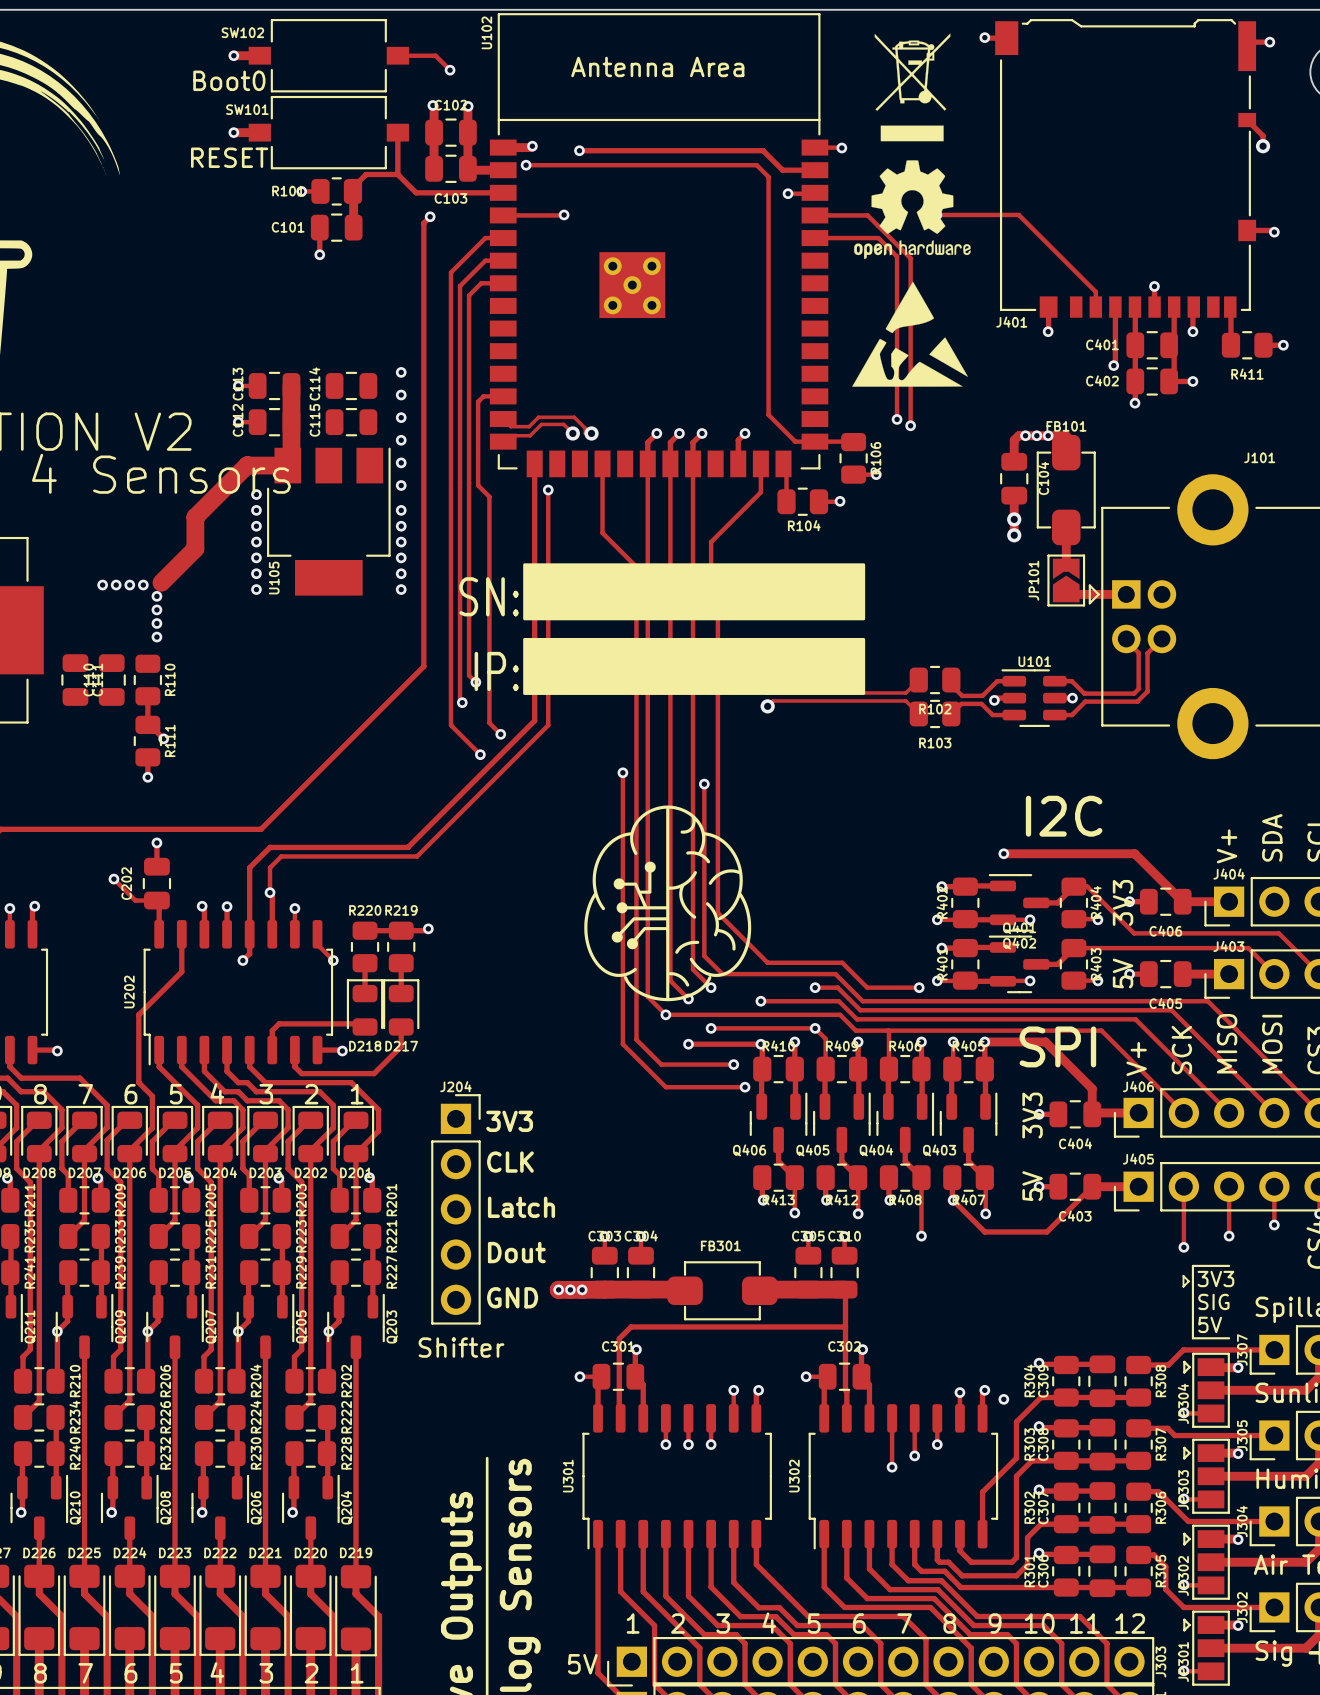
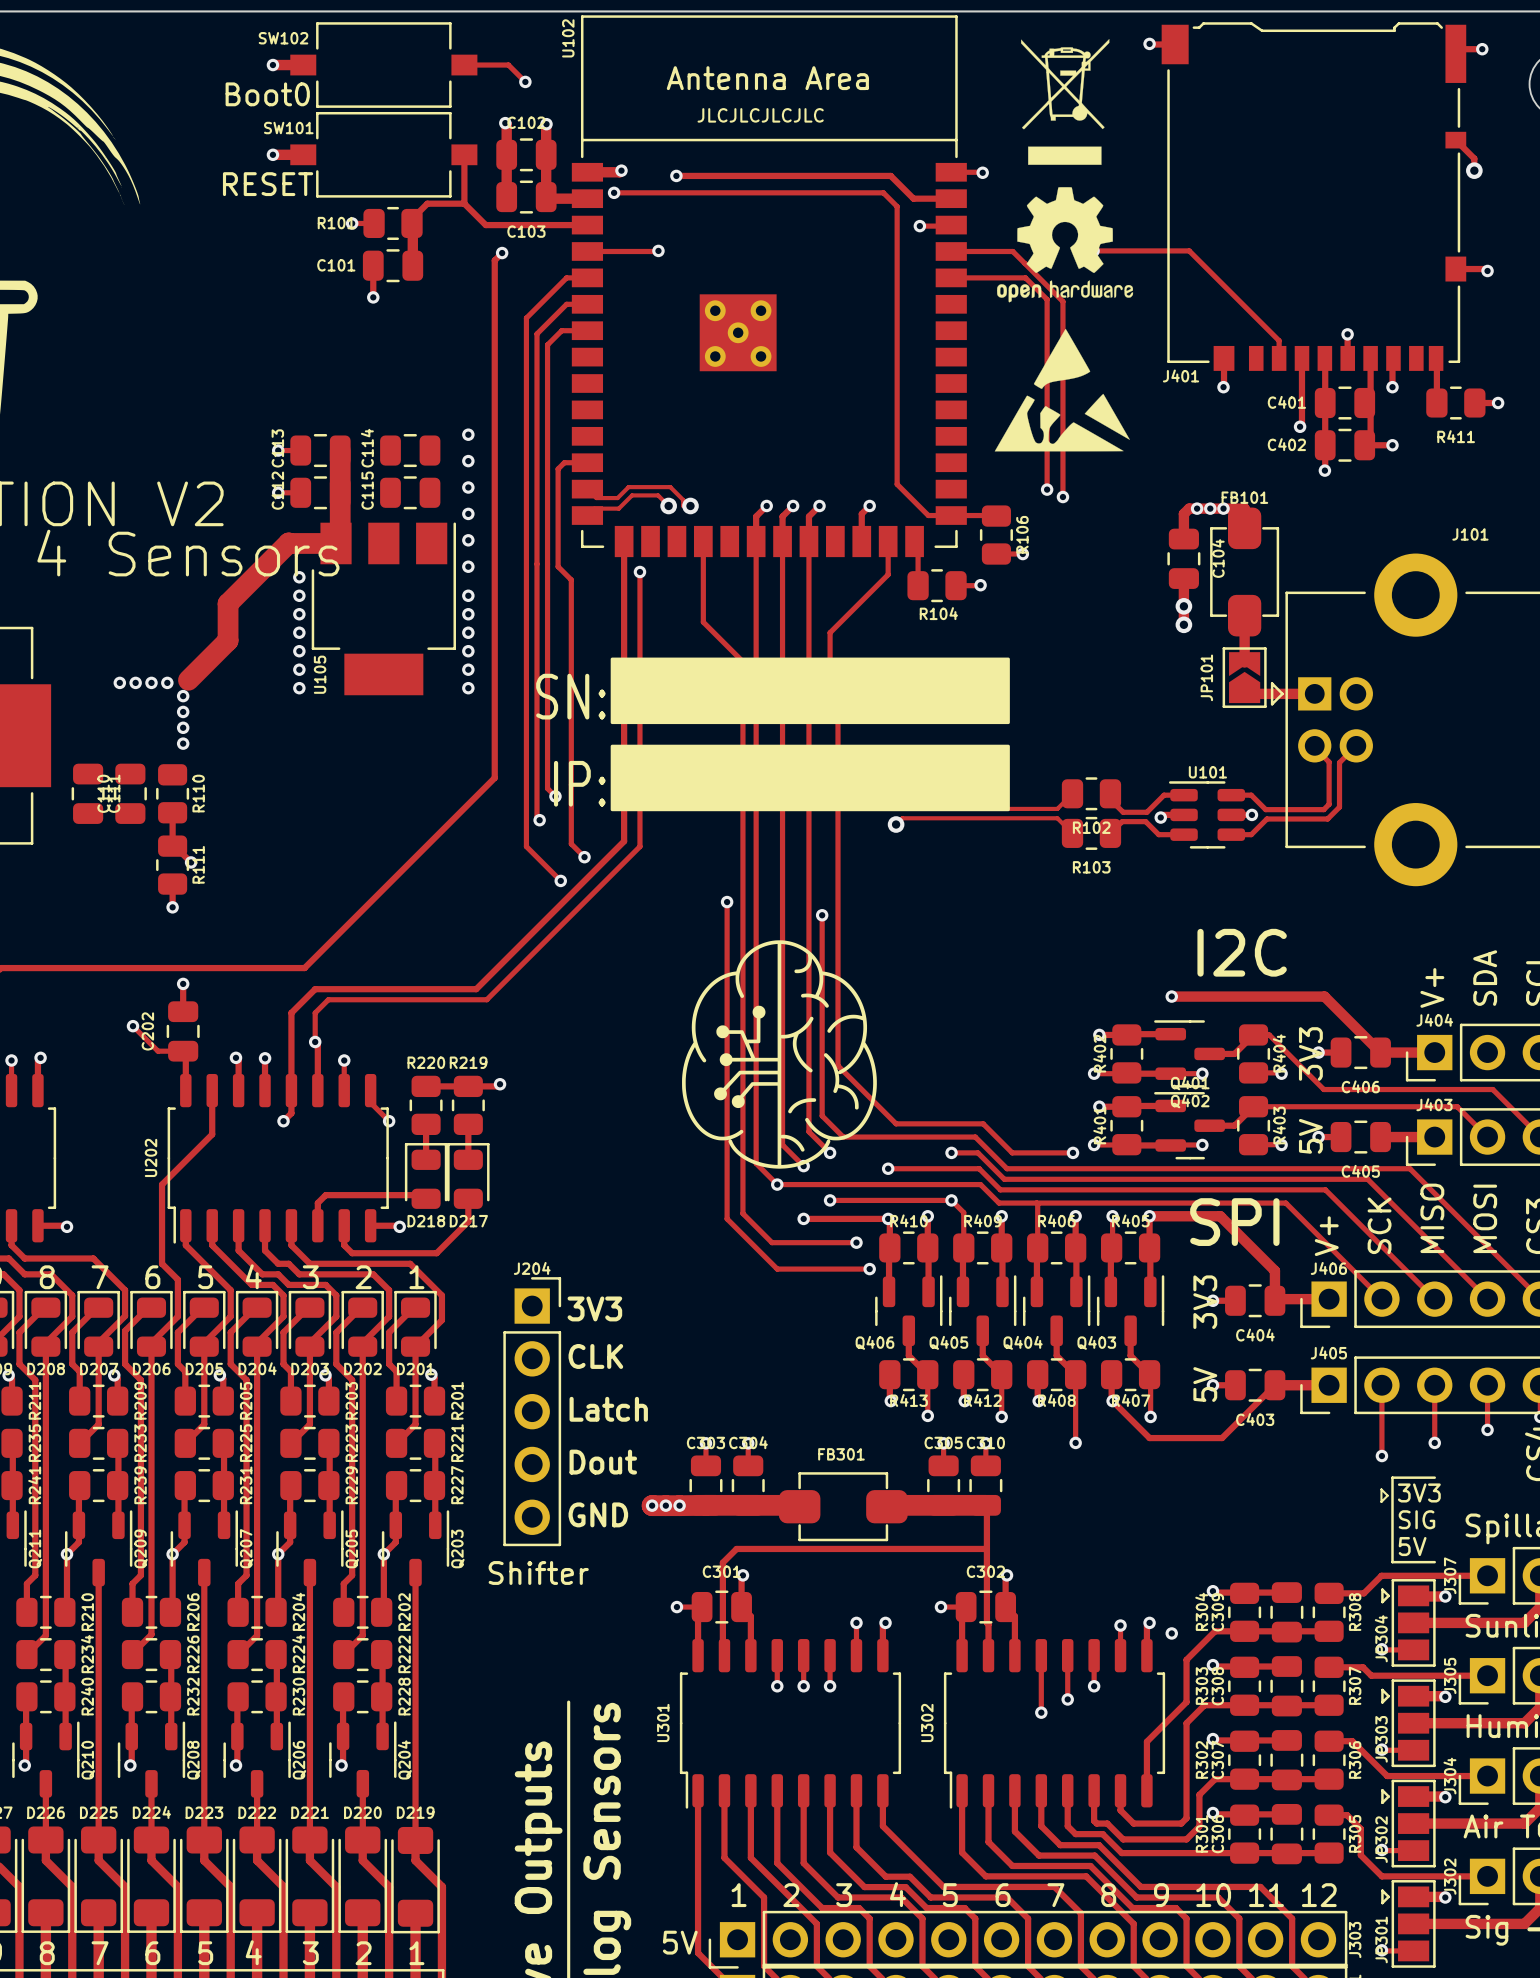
text: none -> JLCJLCJLCJLC (760, 115)

